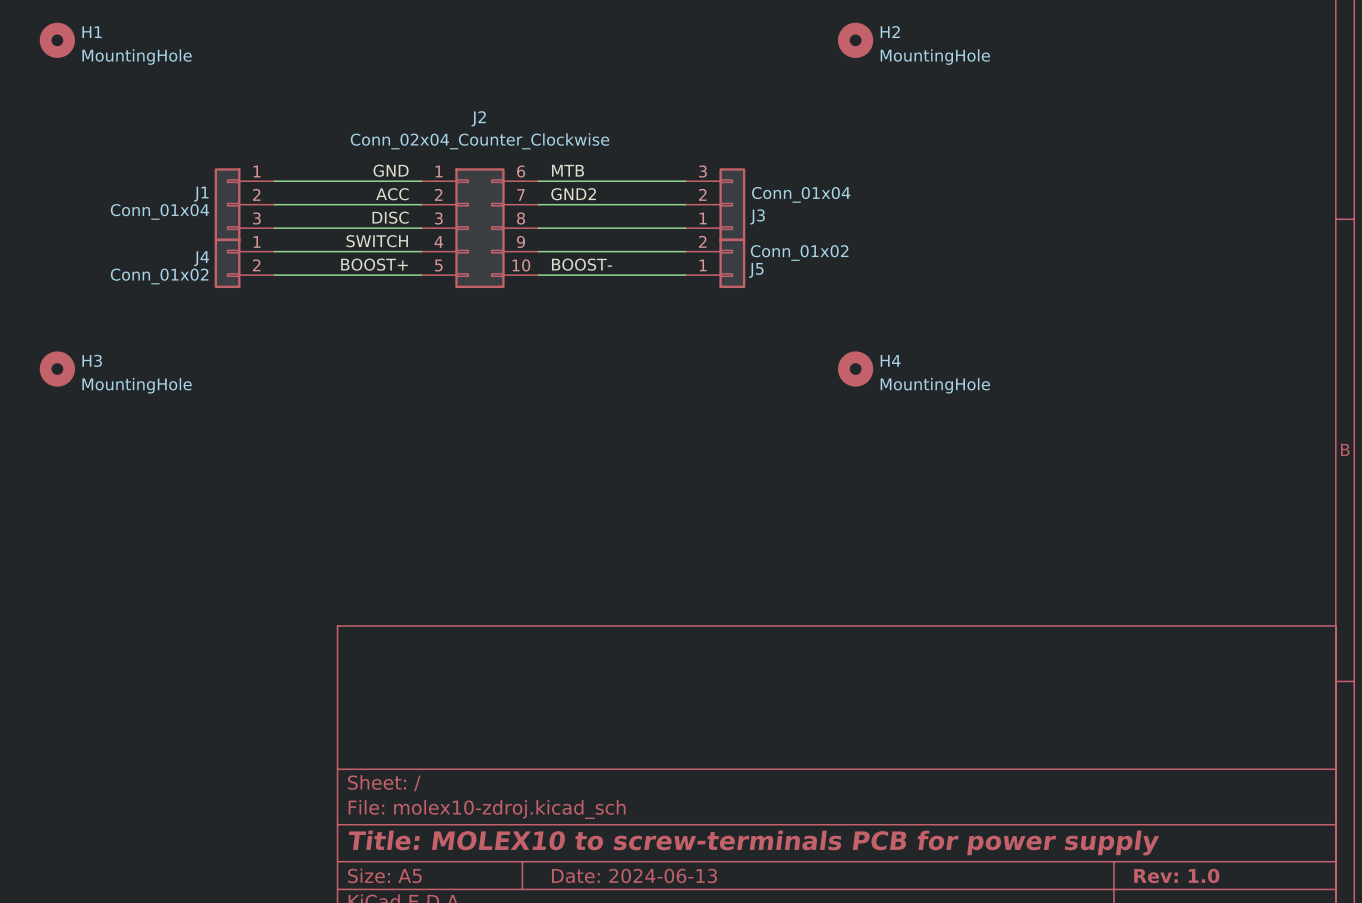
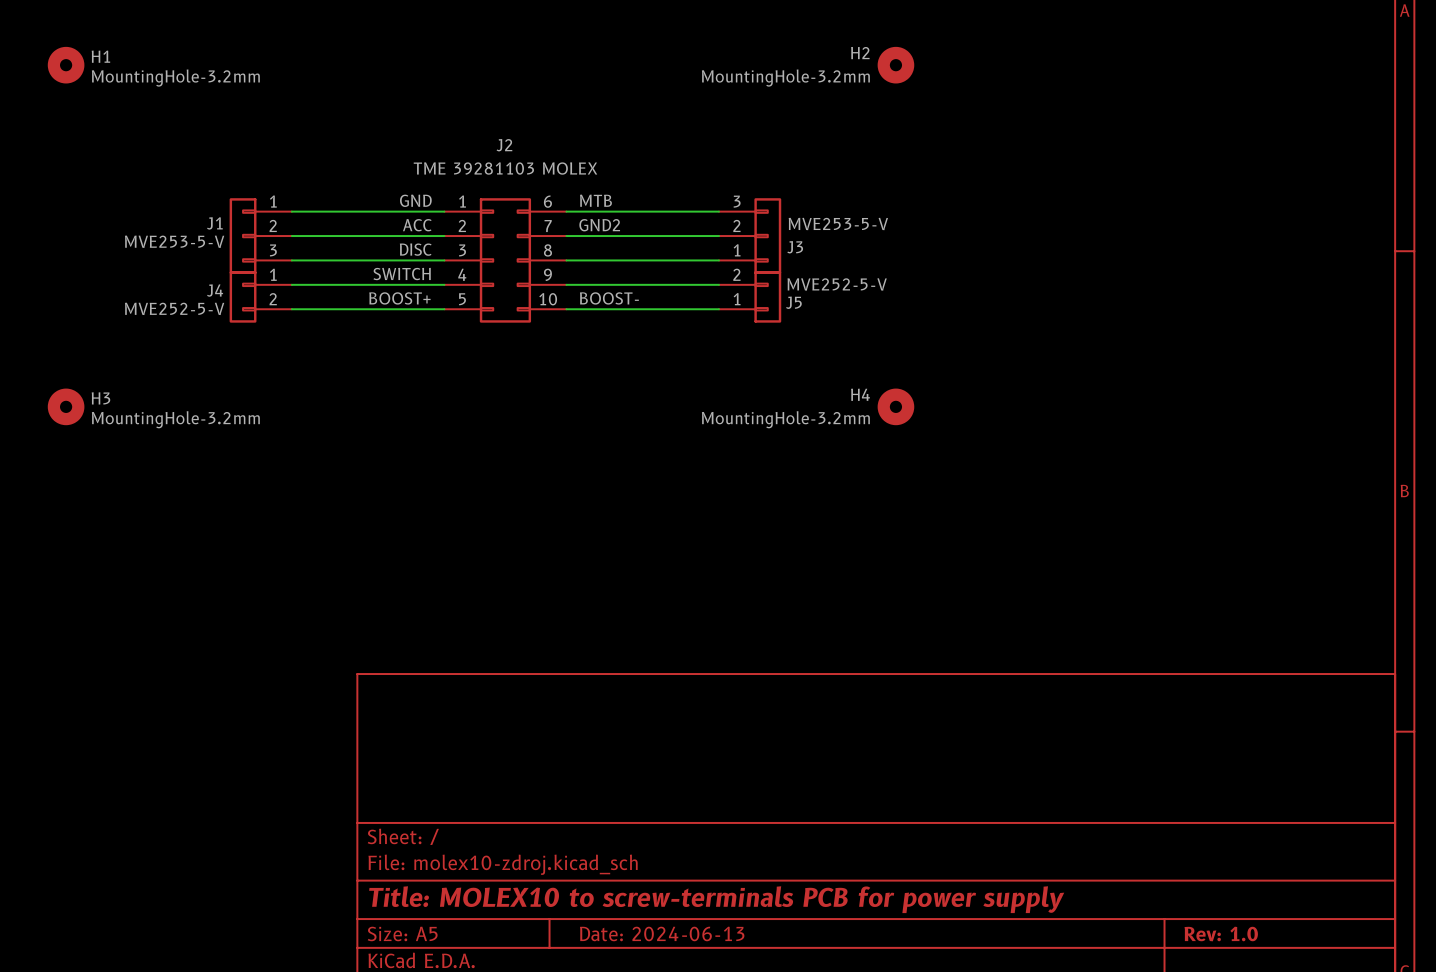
H2 name position: H2 (890, 32) -> H2 (860, 53)
H1 value: MountingHole (137, 57) -> MountingHole-3.2mm (175, 78)
H2 value: MountingHole (935, 57) -> MountingHole-3.2mm (785, 78)
J2 value: Conn_02x04_Counter_Clockwise (479, 141) -> TME 39281103 MOLEX (505, 168)
J3 value: Conn_01x04 (801, 194) -> MVE253-5-V (838, 224)
J1 value: Conn_01x04 (159, 211) -> MVE253-5-V (174, 241)
J5 value: Conn_01x02 (799, 252) -> MVE252-5-V (837, 284)
J4 value: Conn_01x02 (159, 276) -> MVE252-5-V (174, 308)
H4 name position: H4 (890, 360) -> H4 (860, 394)
H3 value: MountingHole (137, 385) -> MountingHole-3.2mm (175, 419)
H4 value: MountingHole (935, 385) -> MountingHole-3.2mm (785, 419)

